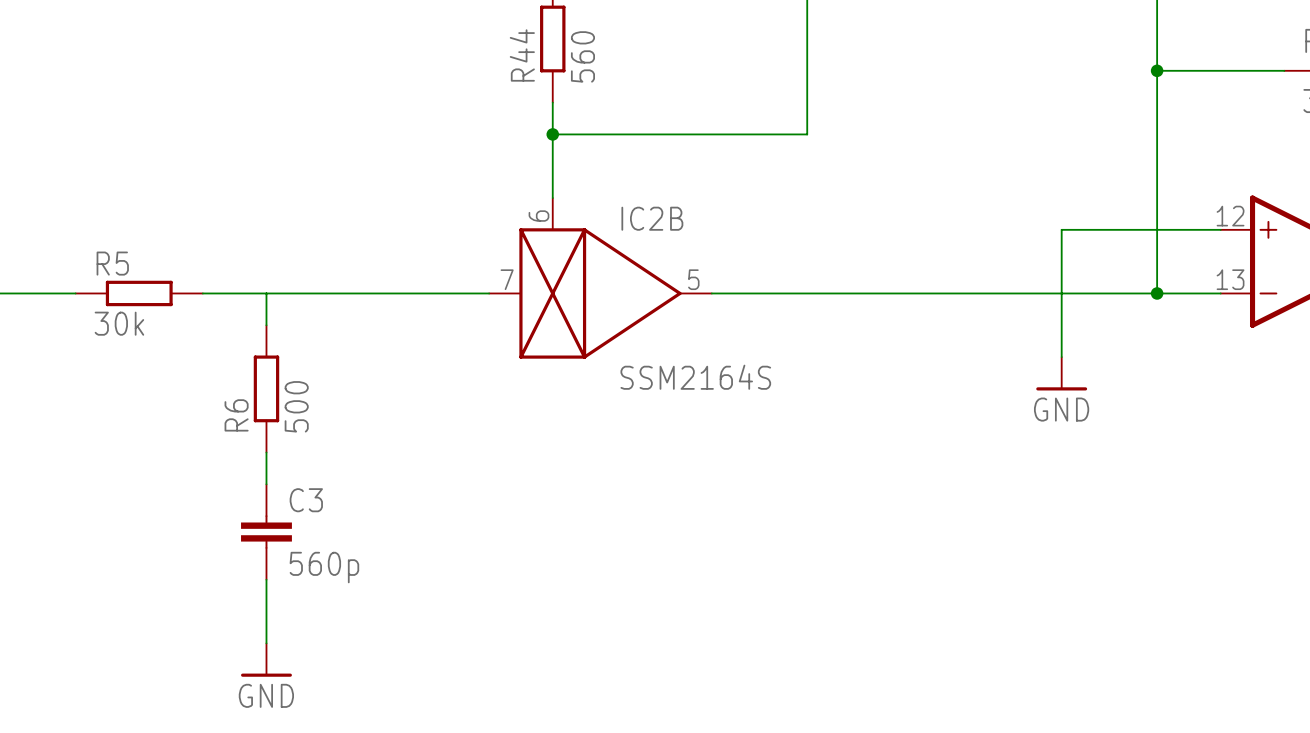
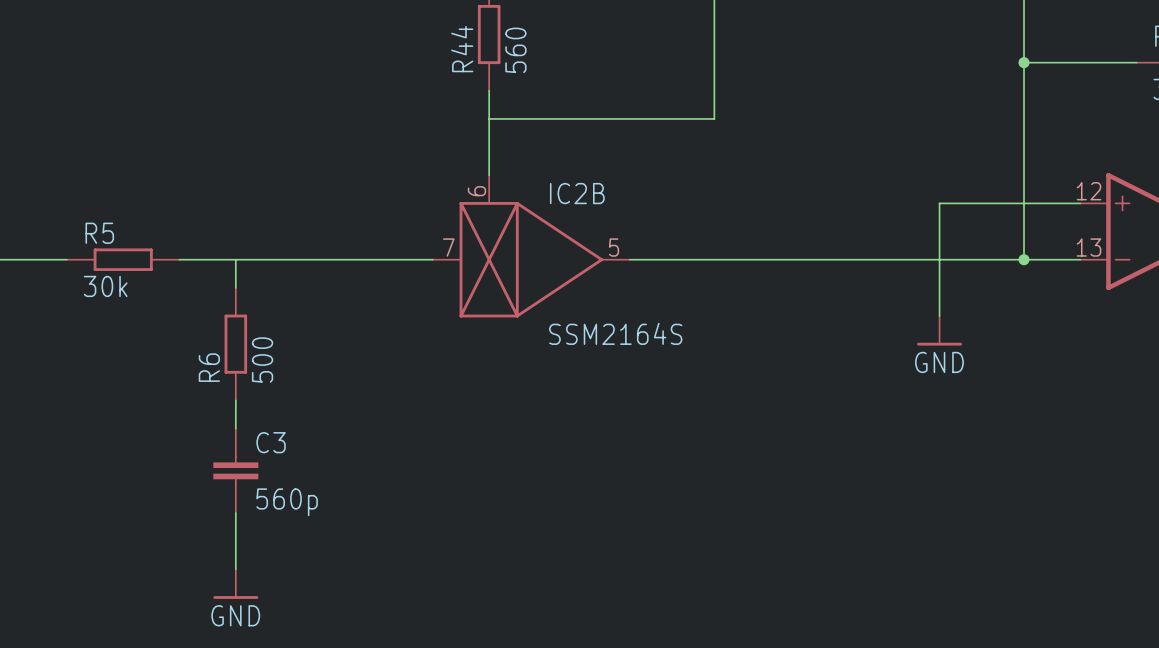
junction: (552, 134) -> none

